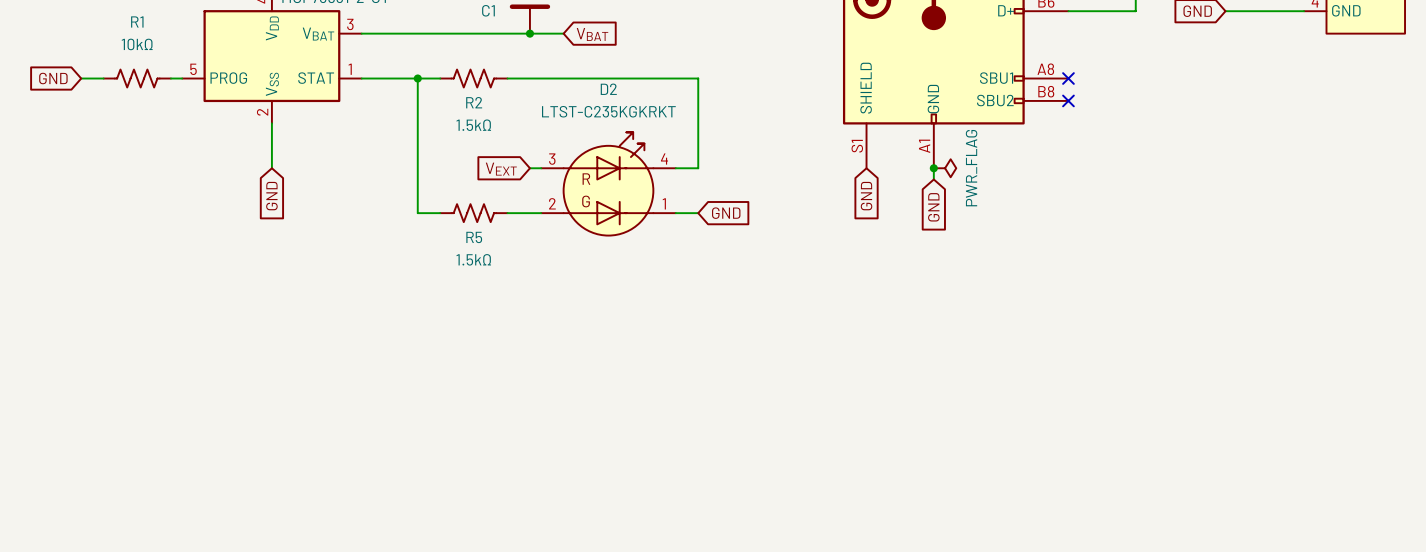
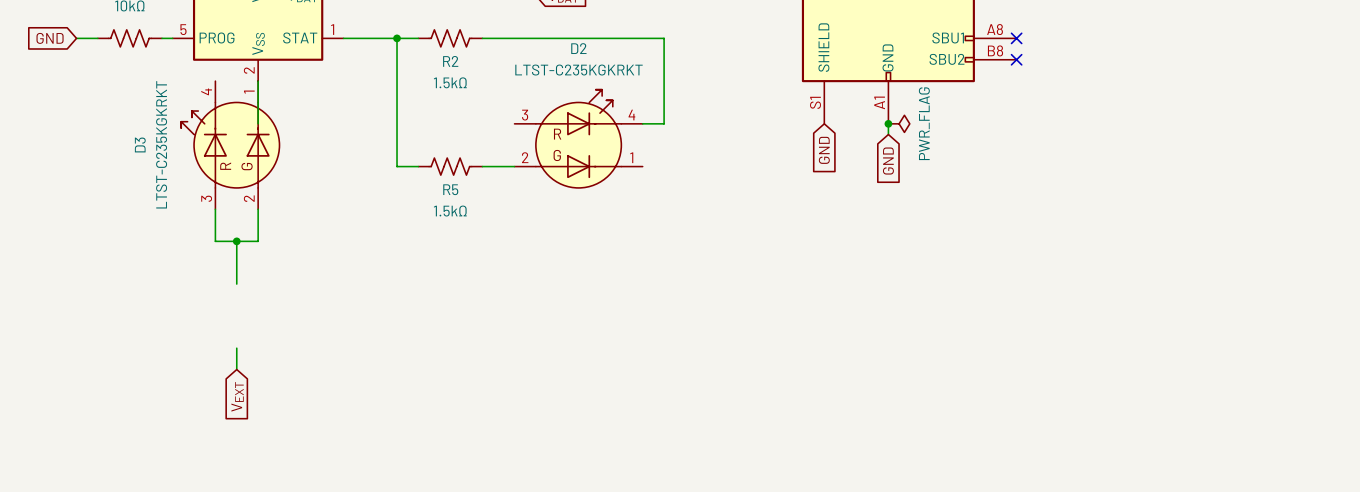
wire: (529, 168) (541, 168) -> none
global label: VEXT (501, 169) -> none
D3: none -> LTST-C235KGKRKT (230, 145)
global label: GND (271, 196) -> none
wire: (675, 213) (698, 213) -> none
global label: GND (726, 213) -> none
wire: none -> (215, 209) (215, 241) (258, 241) (258, 209)
wire: none -> (236, 241) (236, 284)
junction: none -> (236, 241)
wire: none -> (236, 348) (236, 369)
global label: none -> VEXT (237, 396)

